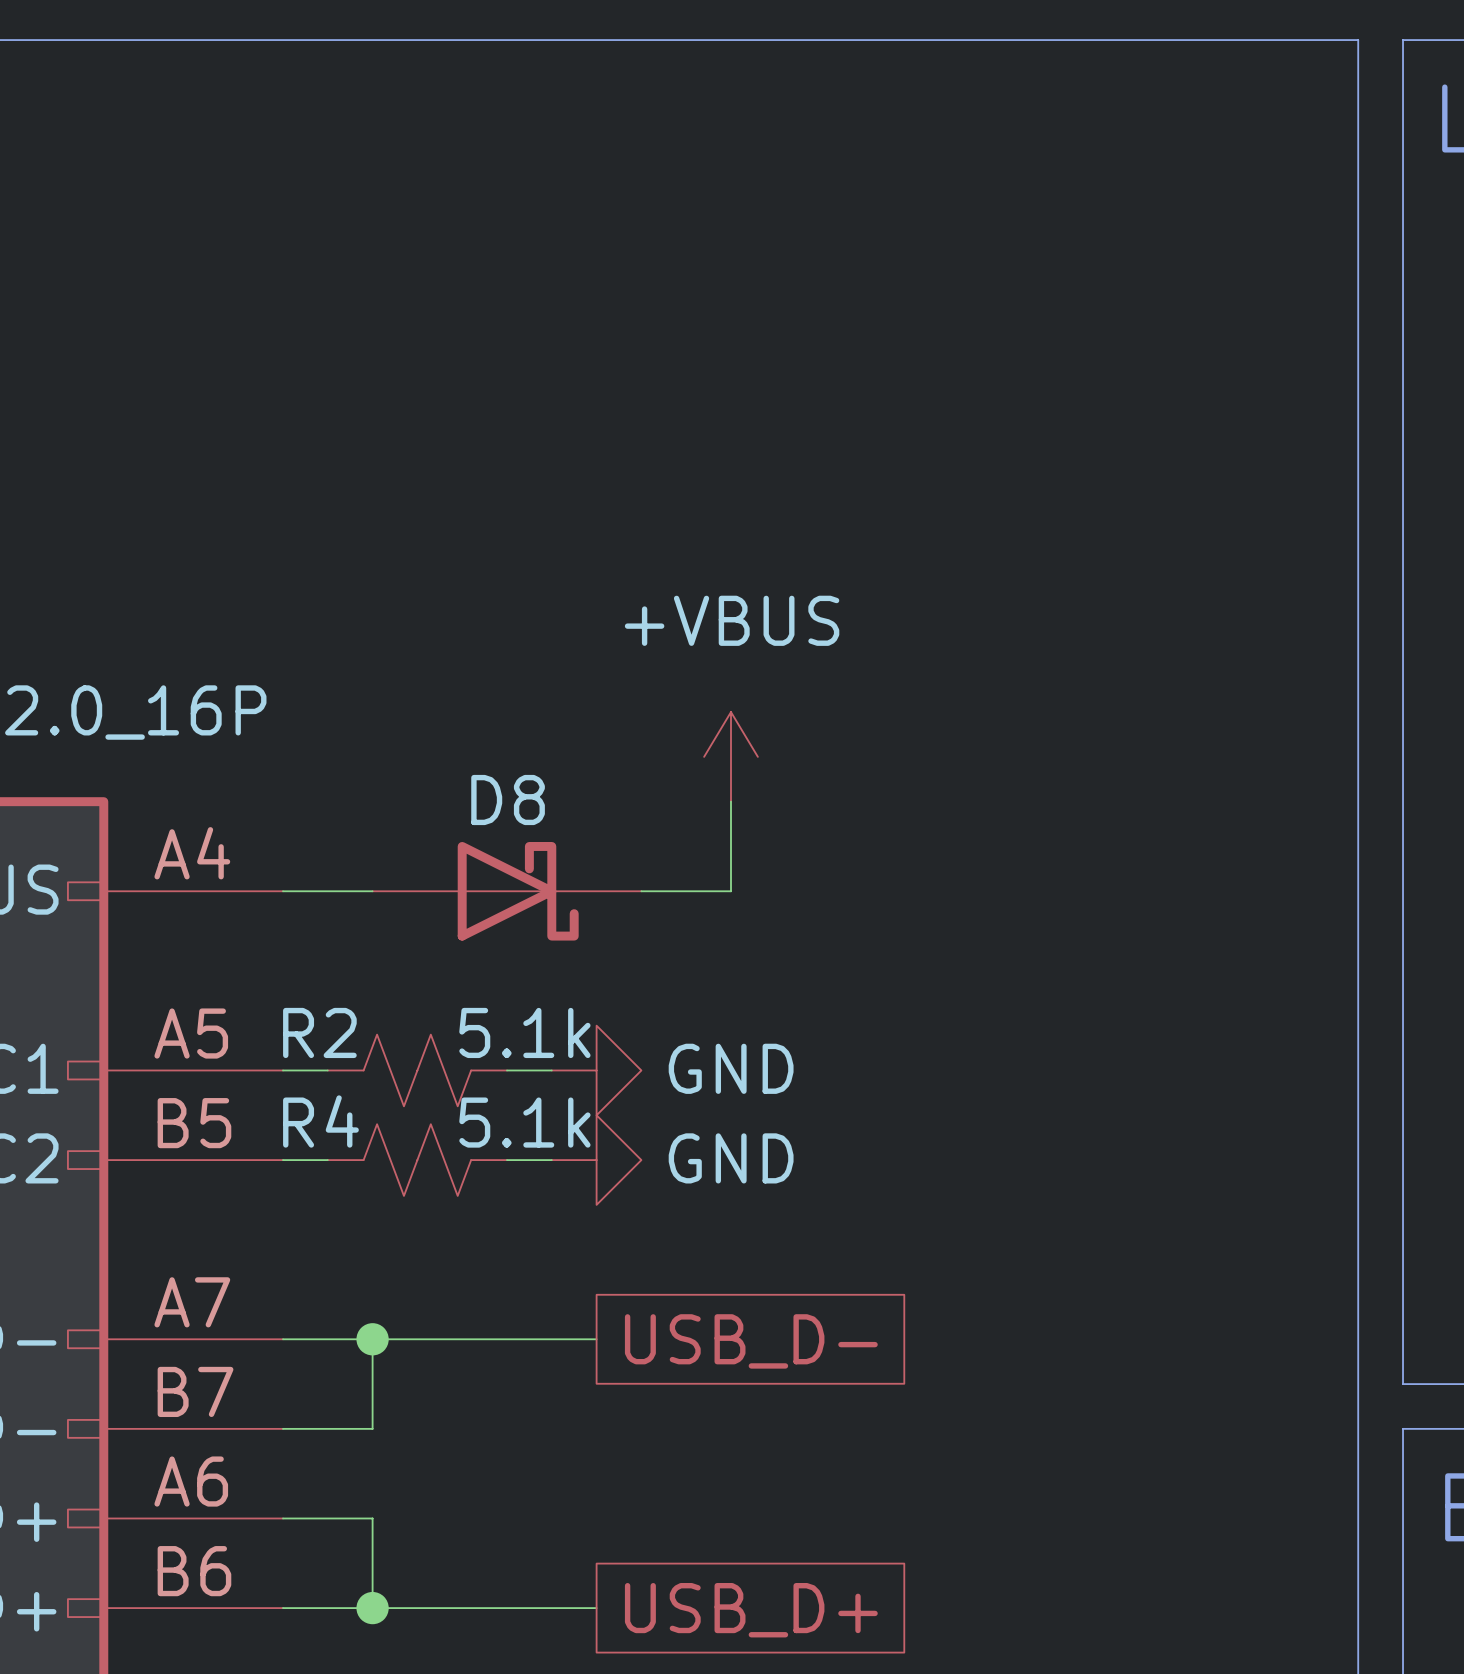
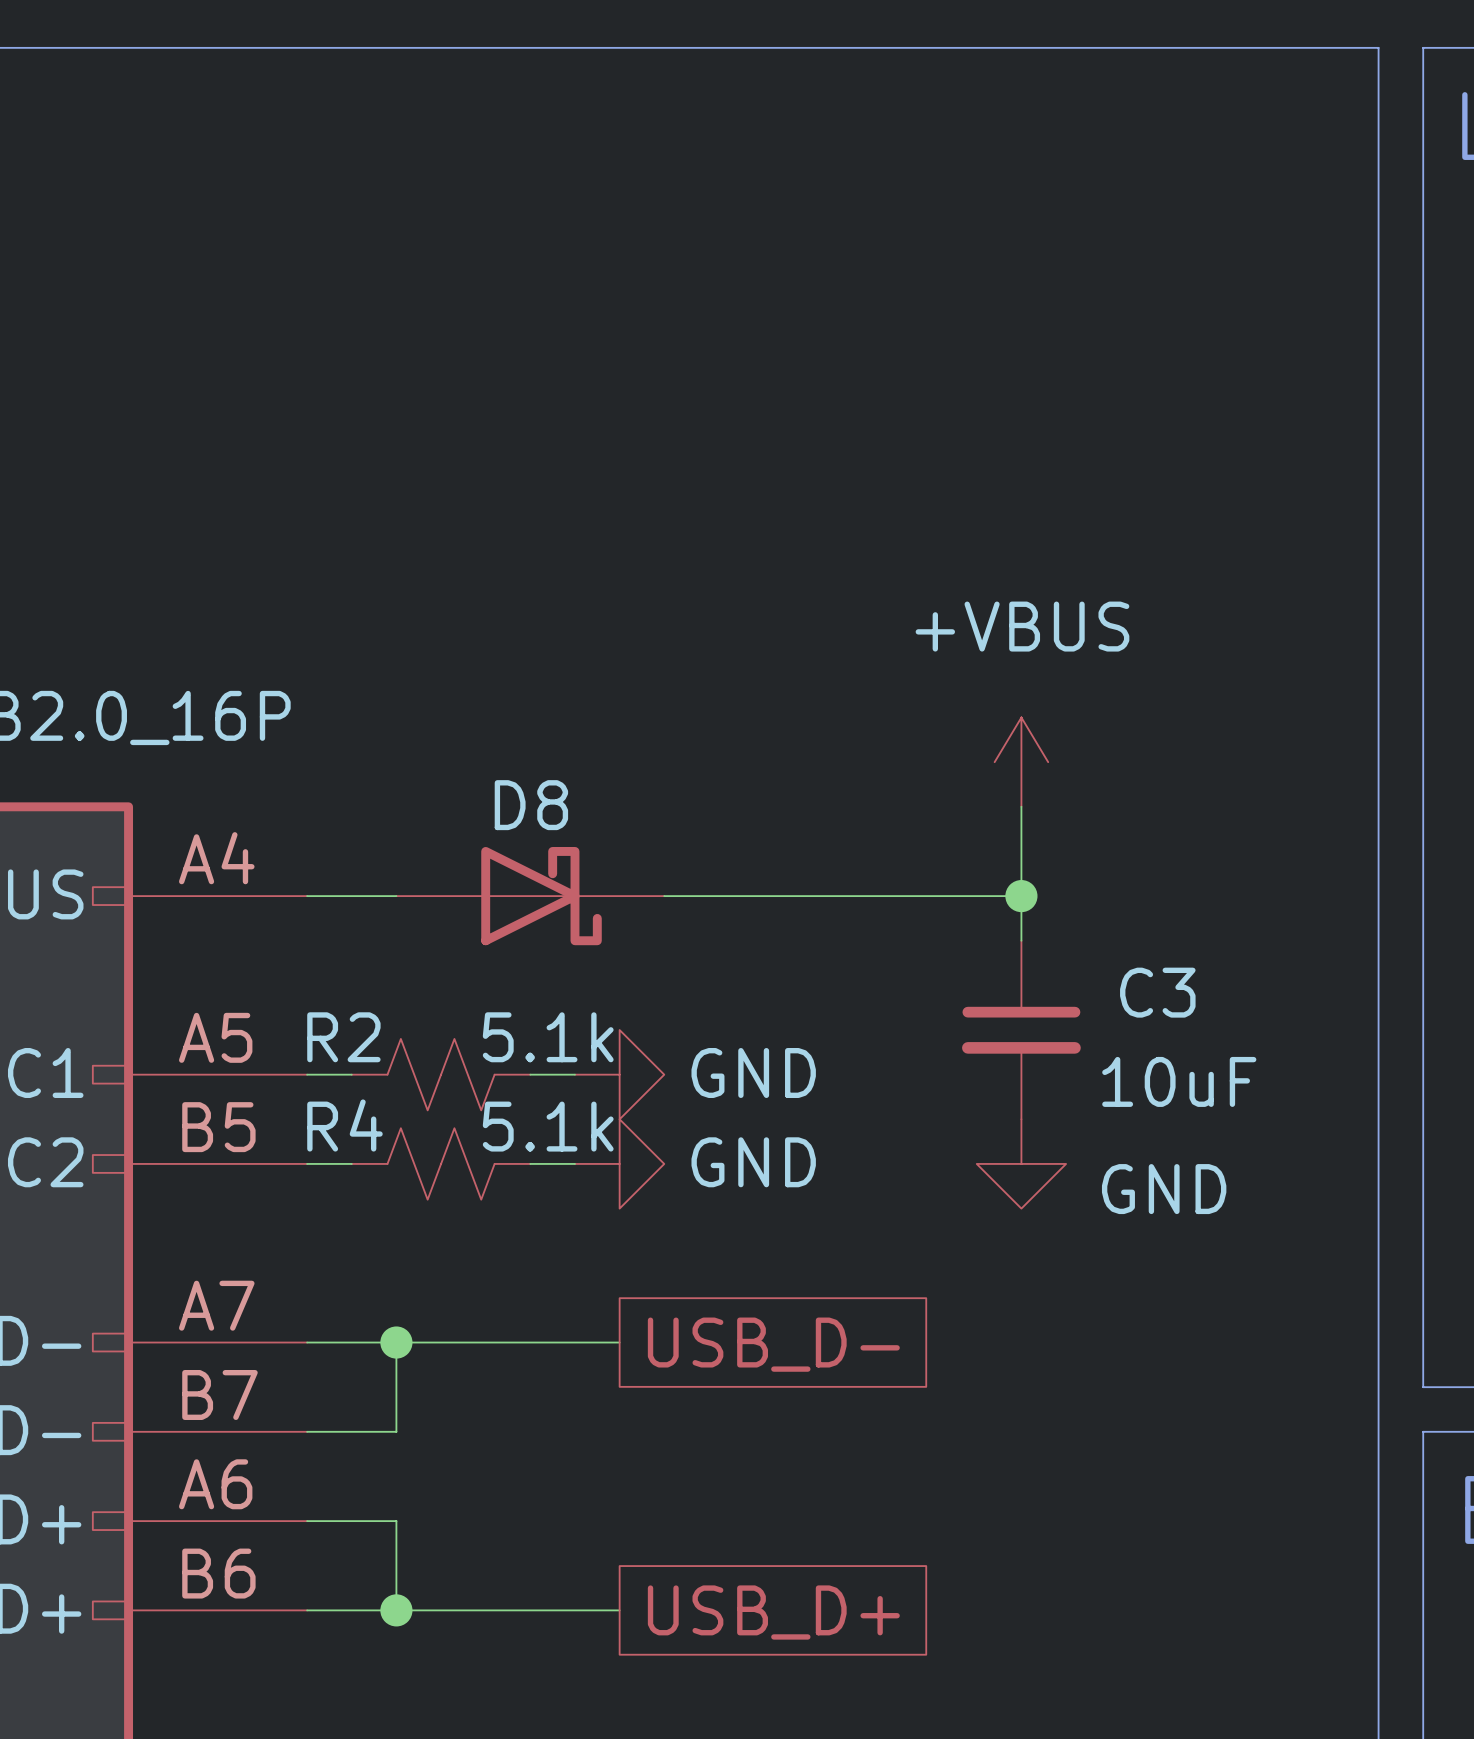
power symbol position: +VBUS (731, 756) -> +VBUS (1021, 762)
wire: (731, 801) (731, 891) -> (1021, 896) (753, 896)
wire: none -> (1021, 806) (1021, 940)
junction: none -> (1021, 896)
C3: none -> 10uF (1021, 1030)
power symbol: none -> GND (1021, 1163)

